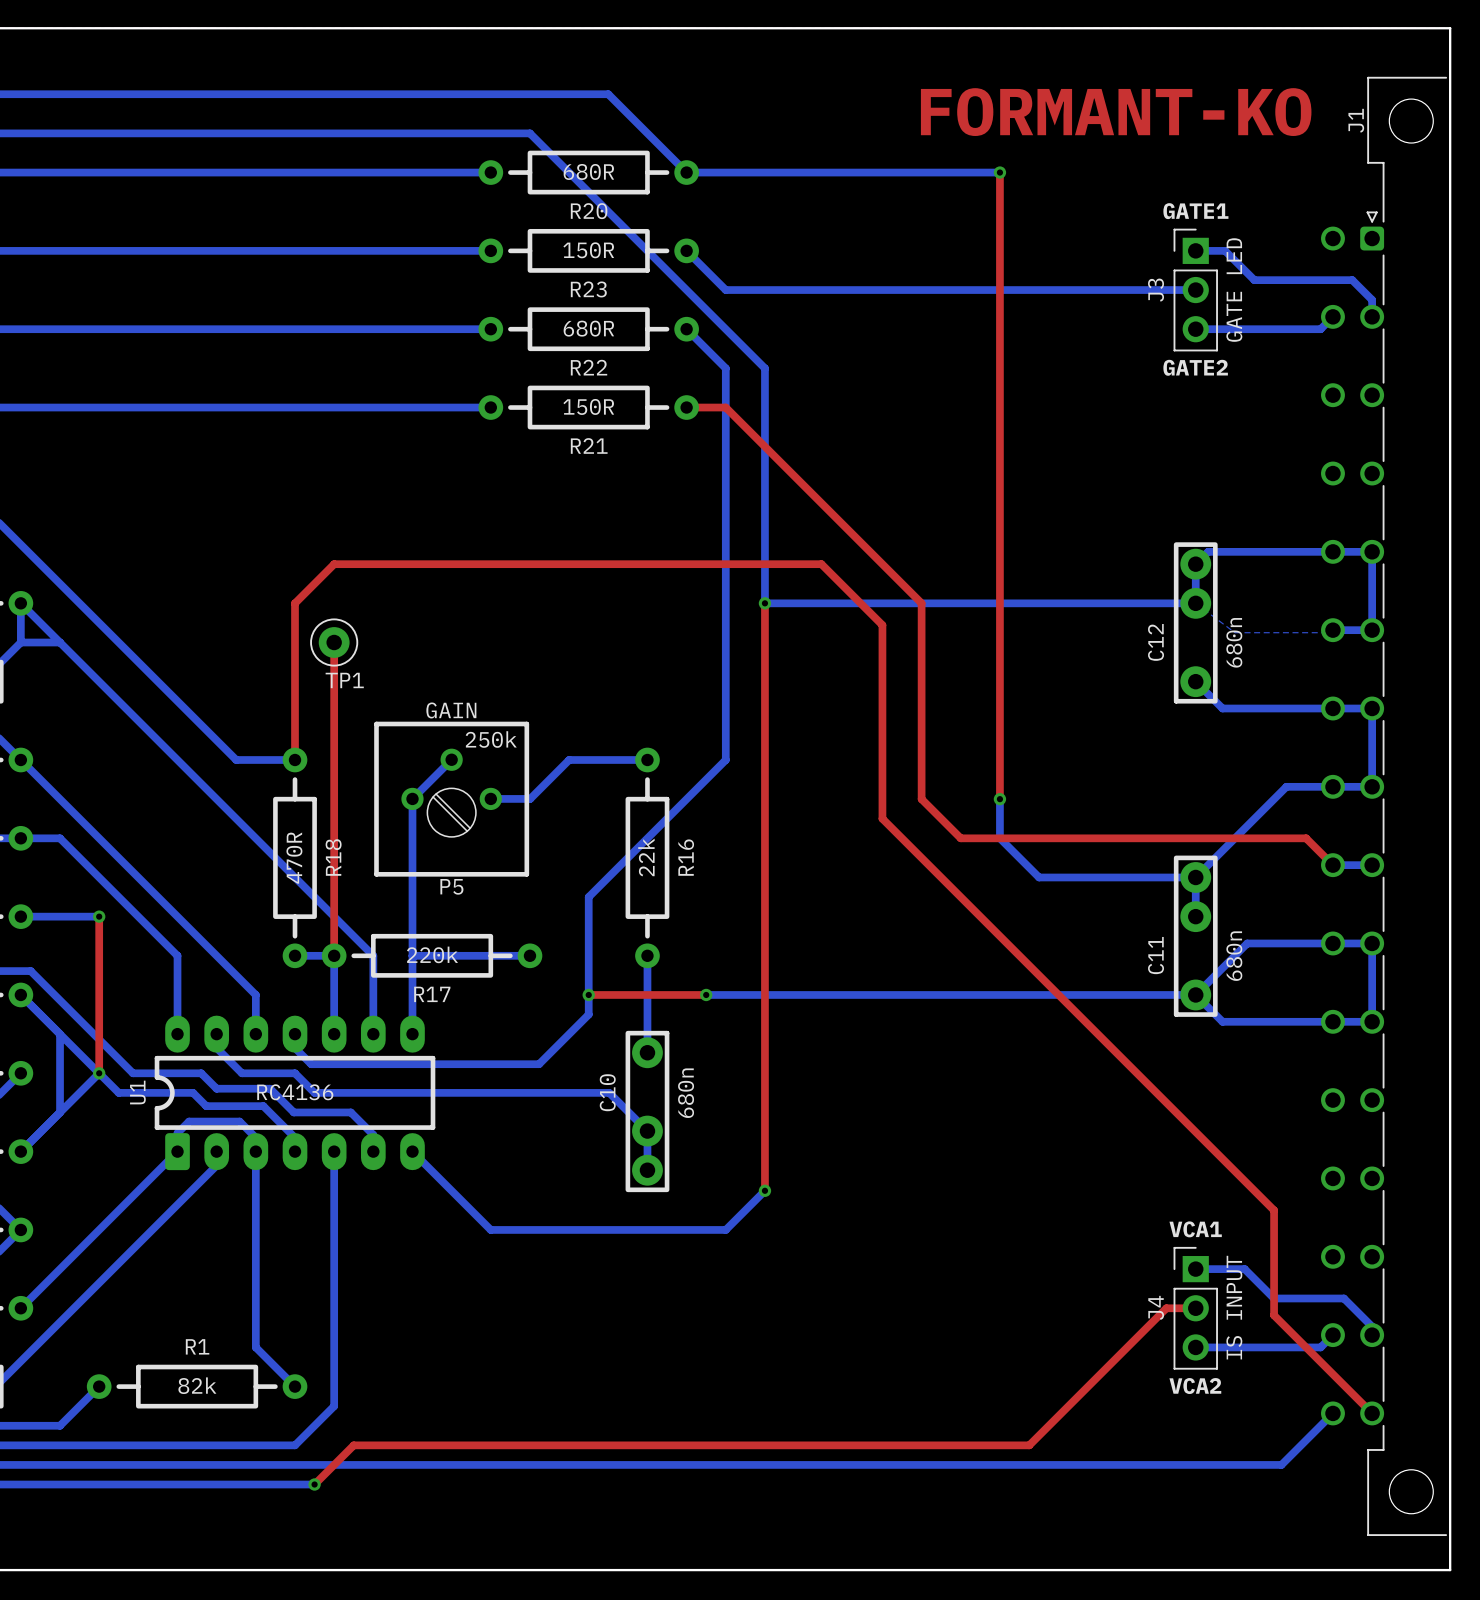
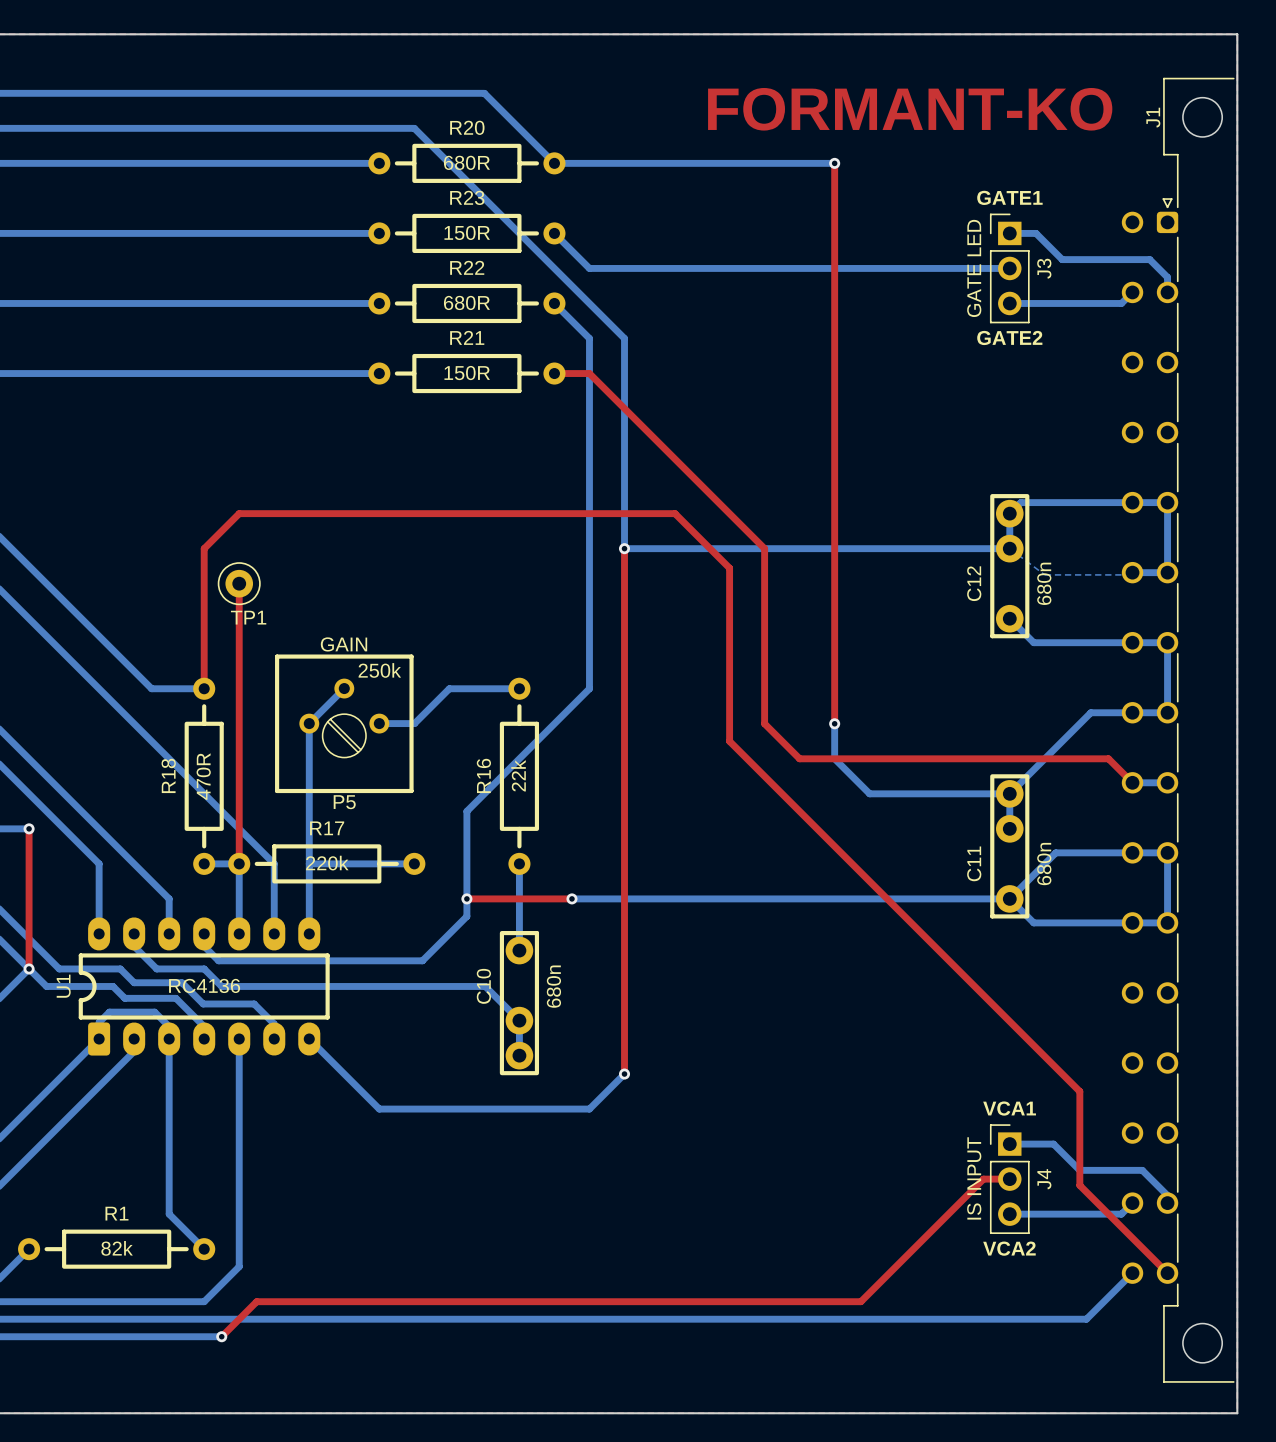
R20 name position: R20 (589, 211) -> R20 (467, 127)
R23 name position: R23 (588, 289) -> R23 (467, 197)
J3 name position: J3 (1156, 290) -> J3 (1044, 268)
J3 value position: GATE LED (1234, 290) -> GATE LED (974, 268)
R22 name position: R22 (589, 367) -> R22 (467, 267)
R21 name position: R21 (589, 445) -> R21 (467, 337)
R18 name position: R18 (333, 857) -> R18 (168, 775)
R16 name position: R16 (686, 857) -> R16 (483, 775)
R17 name position: R17 (432, 994) -> R17 (327, 828)
J4 name position: J4 (1156, 1307) -> J4 (1044, 1179)
J4 value position: IS INPUT (1234, 1307) -> IS INPUT (974, 1178)

